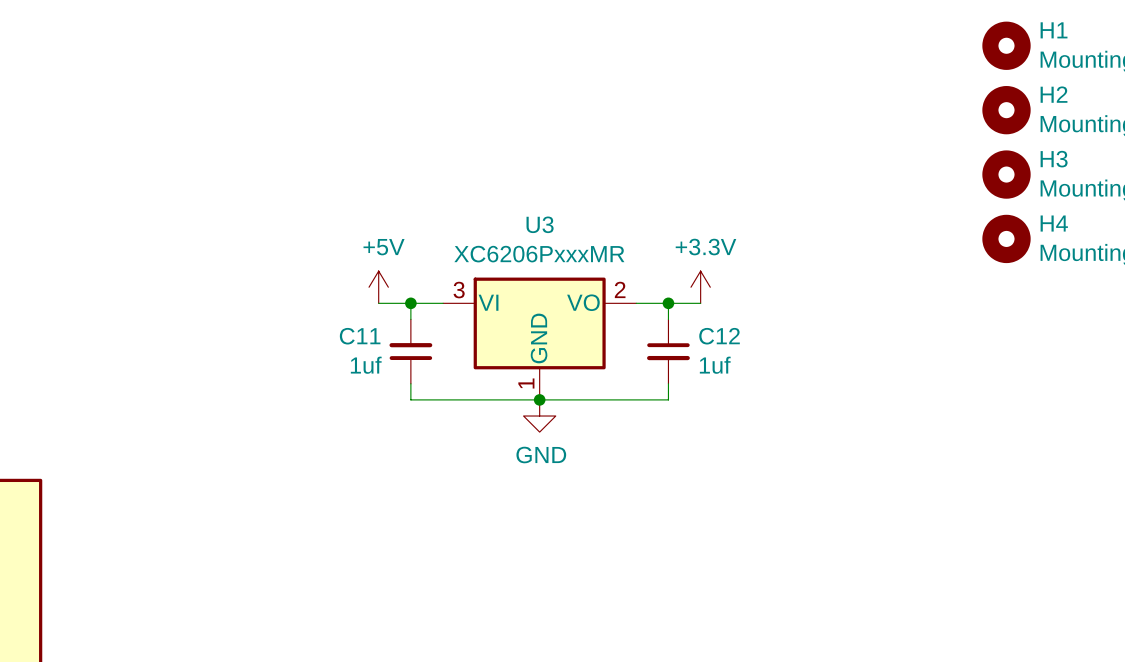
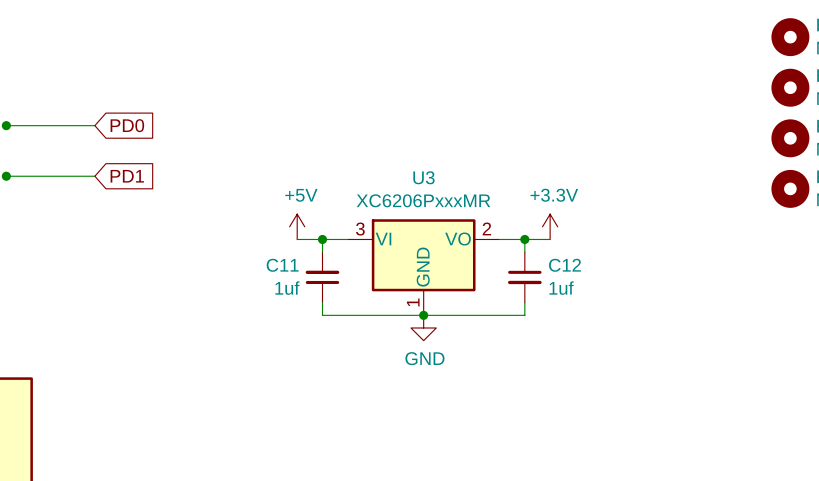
wire: none -> (6, 125) (94, 125)
junction: none -> (6, 125)
global label: none -> PD0 (127, 125)
wire: none -> (6, 176) (94, 176)
junction: none -> (6, 176)
global label: none -> PD1 (127, 176)

